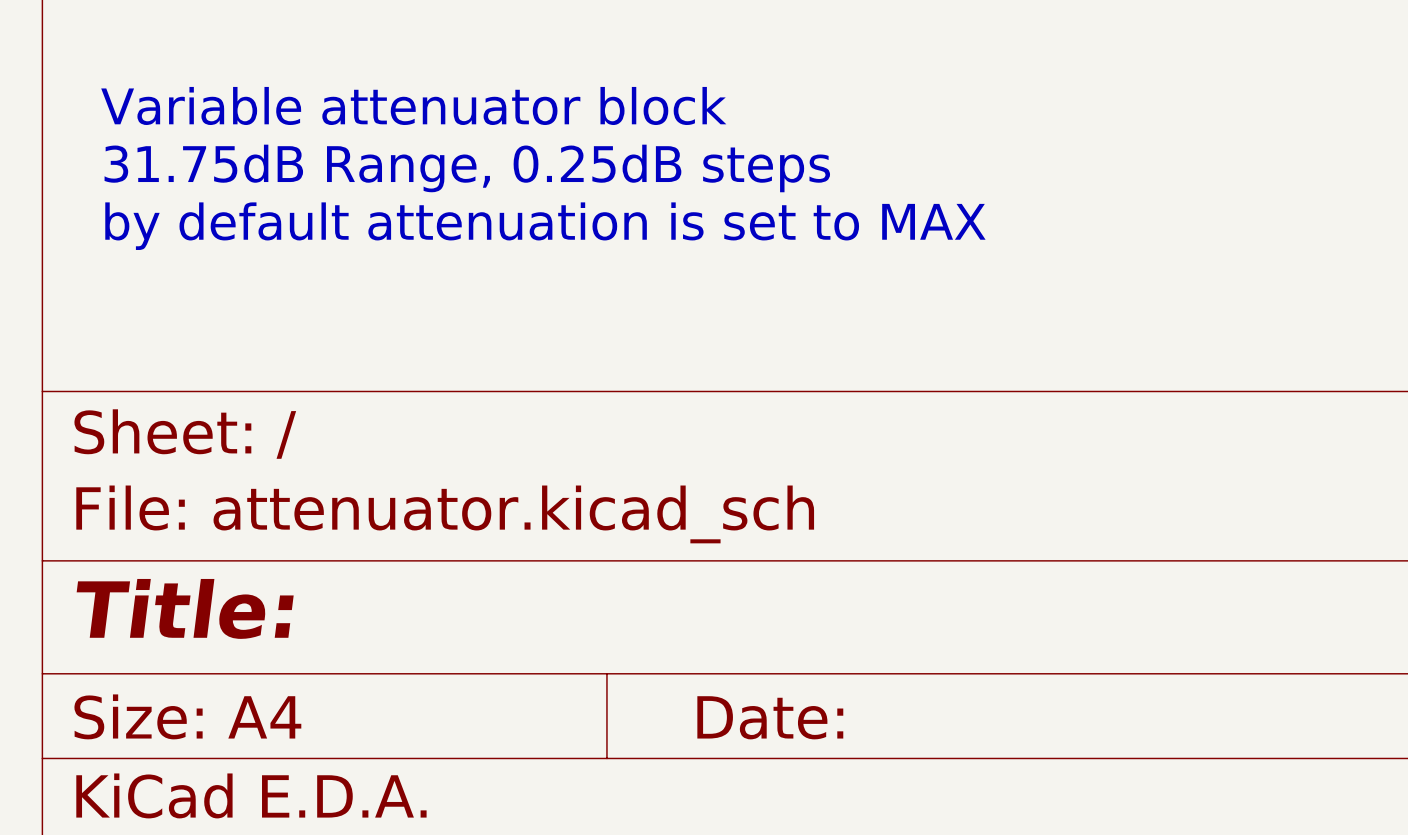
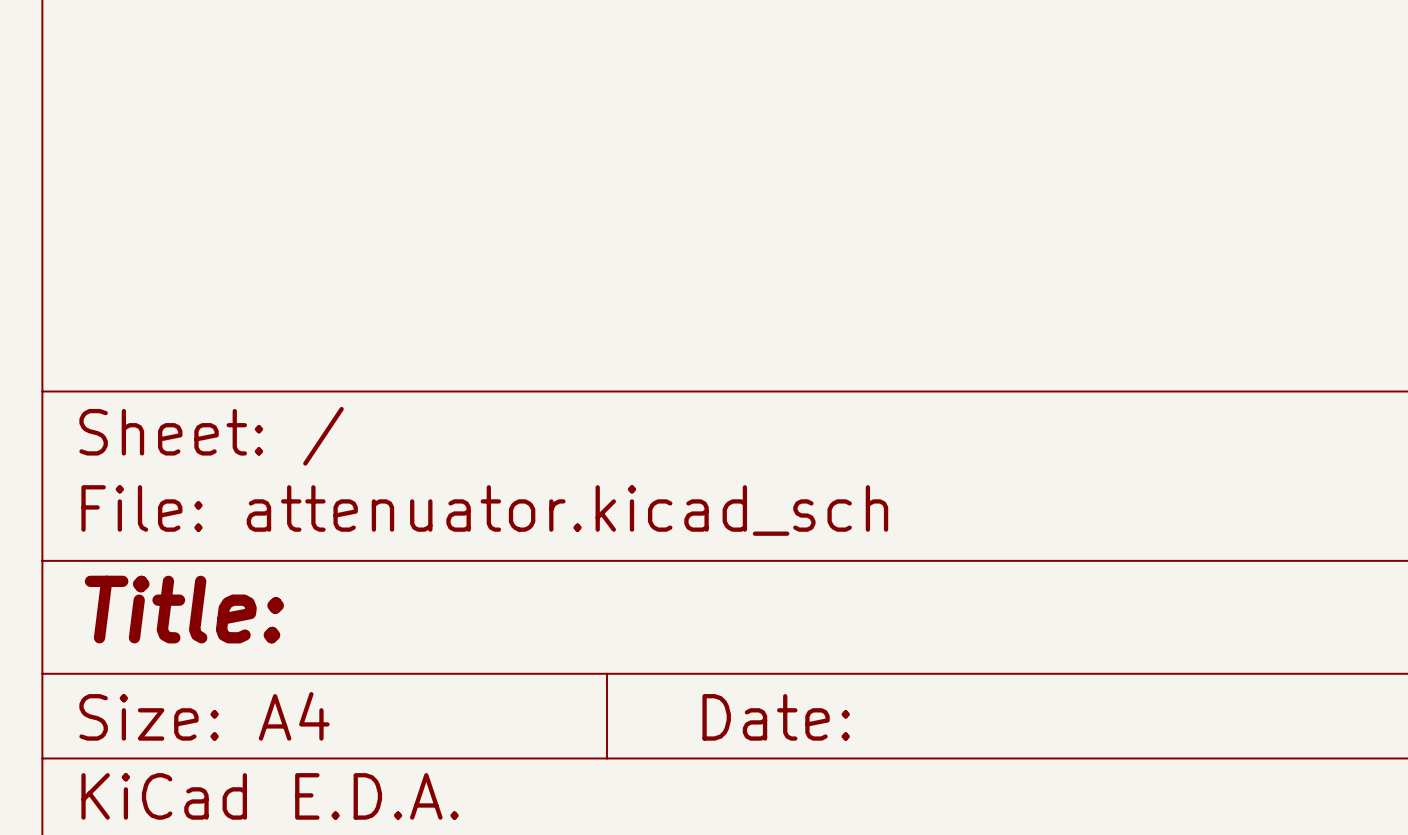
text: Variable attenuator block (413, 105) -> none
text: 31.75dB Range, 0.25dB steps (467, 168) -> none
text: by default attenuation is set to MAX (545, 226) -> none

